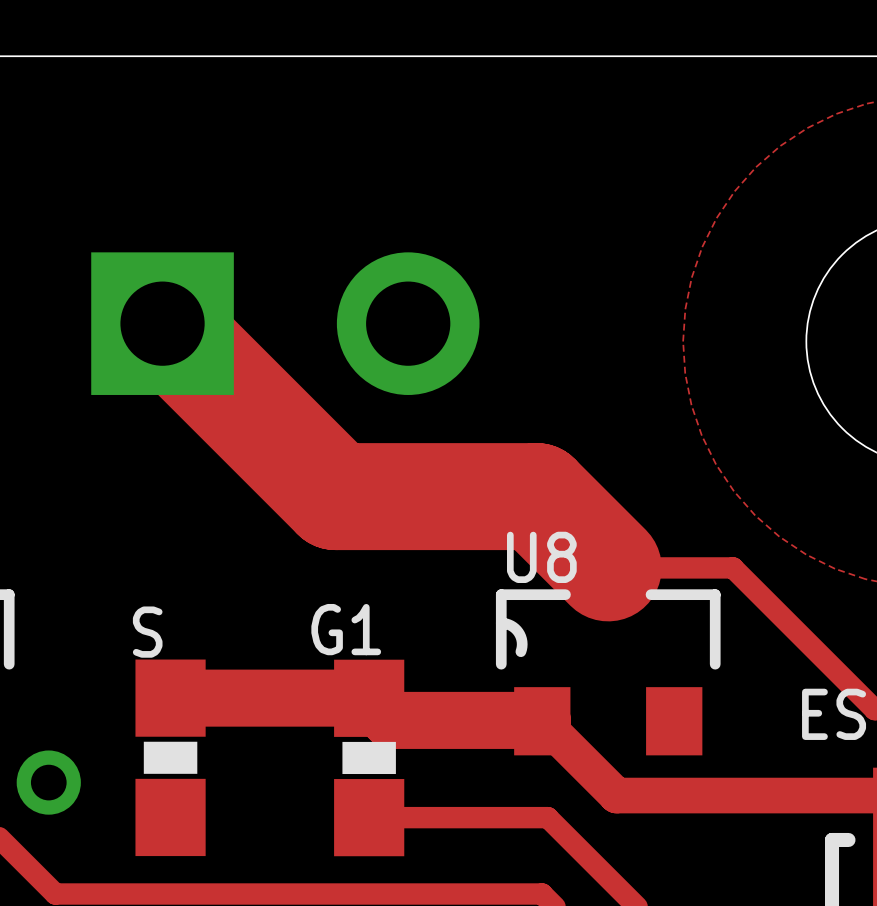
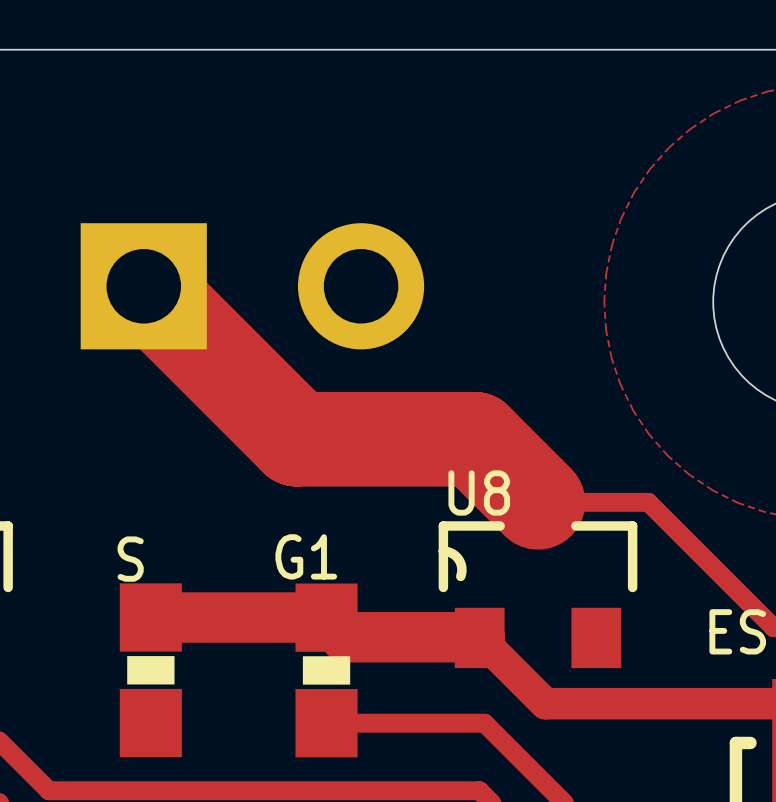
via: (48, 782) -> none

